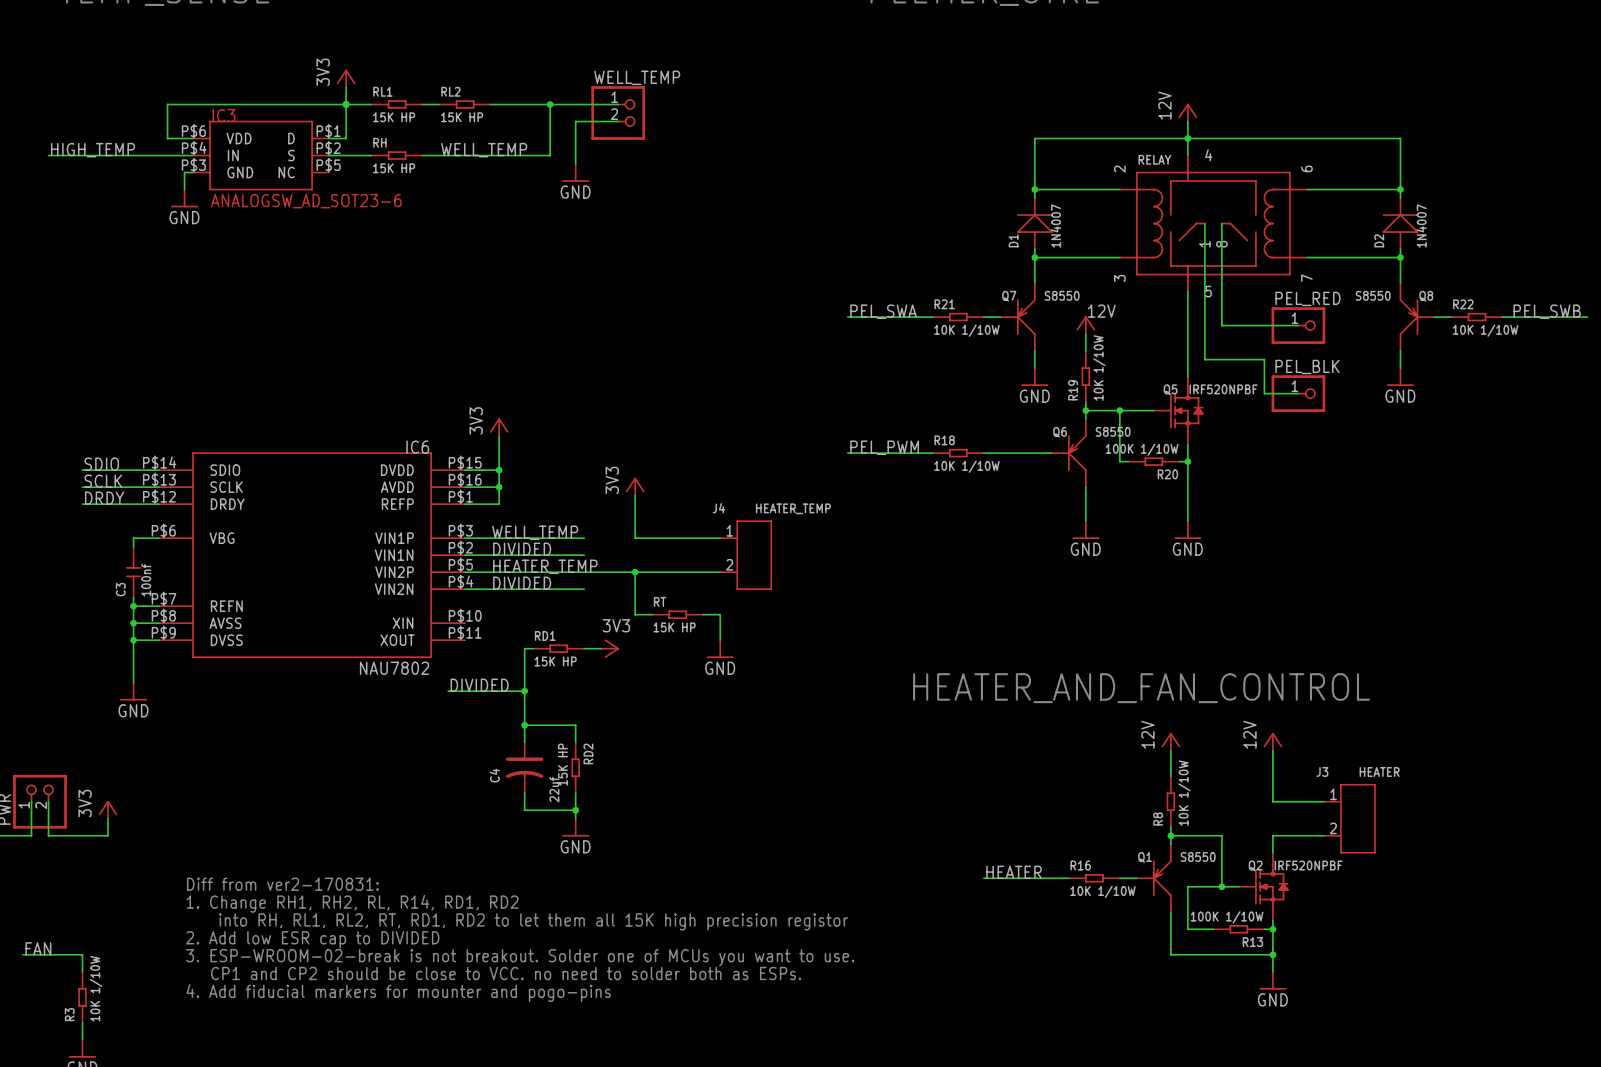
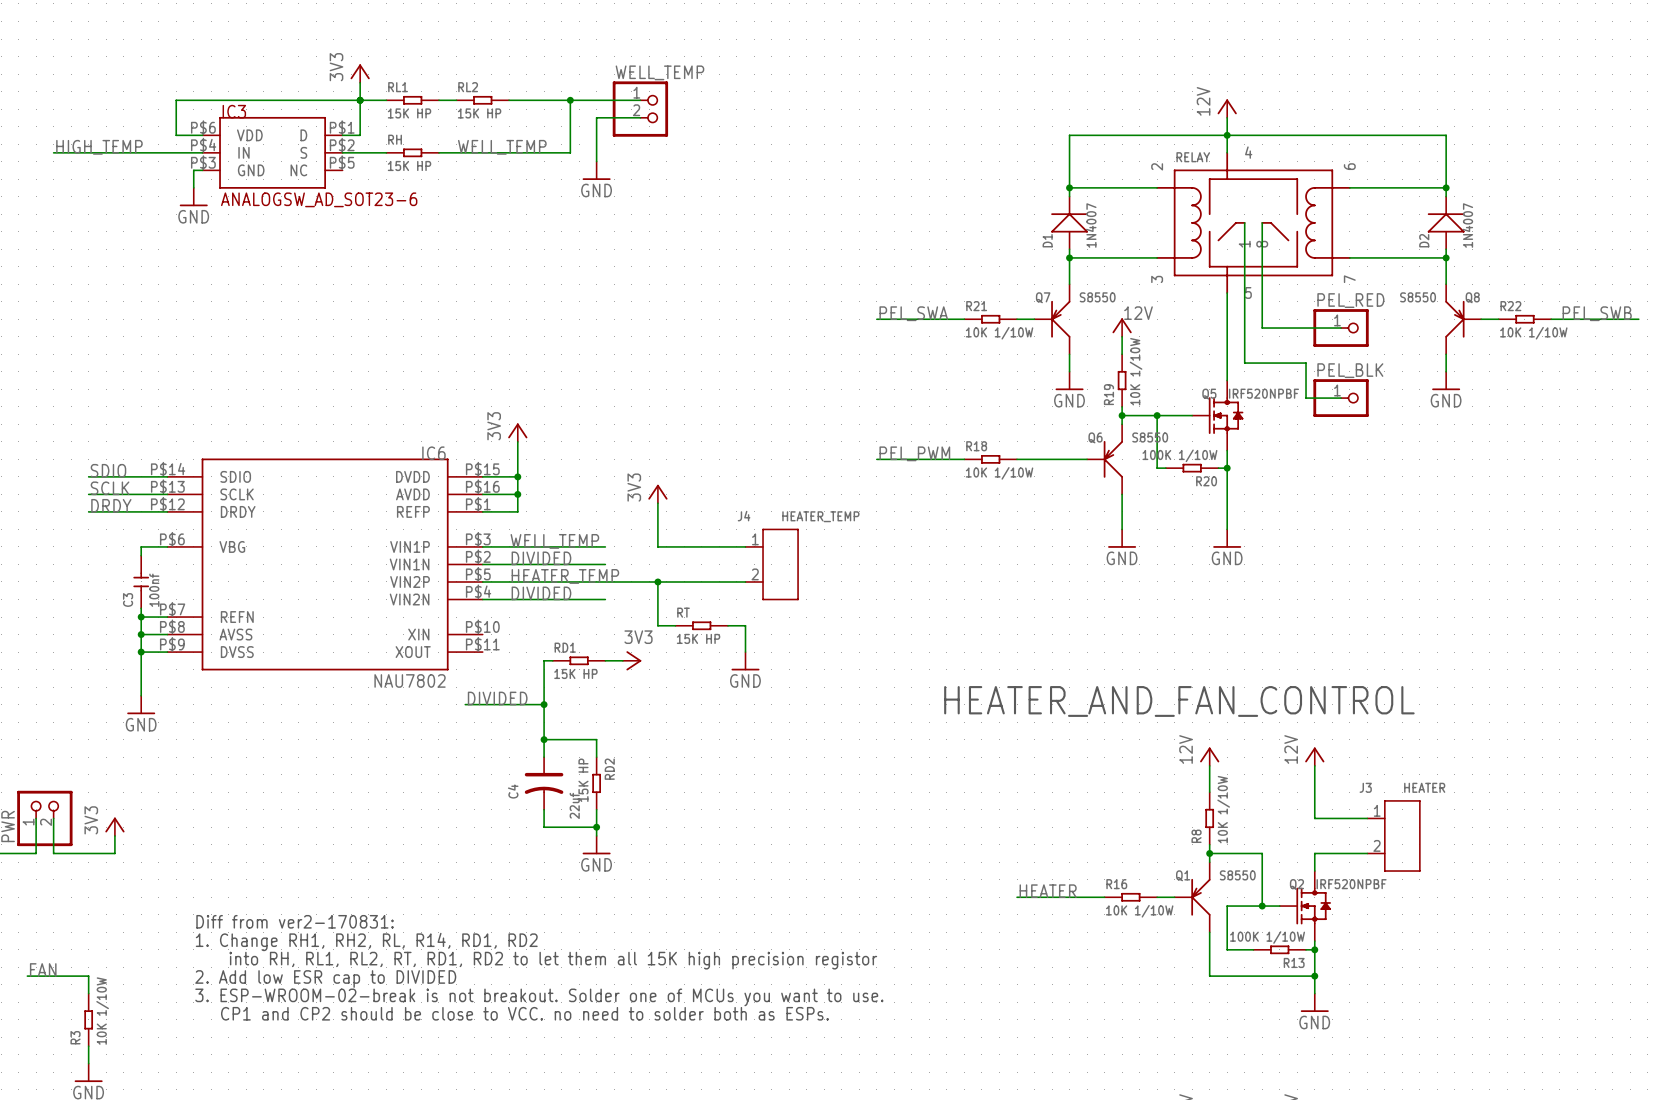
text: Diff from ver2-170831: (282, 884) -> none
text: 1. Change RH1, RH2, RL, R14, RD1, RD2 (352, 903) -> Diff from ver2-170831: (295, 921)
text: into RH, RL1, RL2, RT, RD1, RD2 to let them all 15K high precision registor (533, 921) -> 1. Change RH1, RH2, RL, R14, RD1, RD2 (366, 941)
text: 2. Add low ESR cap to DIVIDED (312, 939) -> into RH, RL1, RL2, RT, RD1, RD2 to let them all 15K high precision registor (553, 960)
text: 3. ESP-WROOM-02-break is not breakout. Solder one of MCUs you want to use. (520, 957) -> 2. Add low ESR cap to DIVIDED (325, 979)
text: CP1 and CP2 should be close to VCC. no need to solder both as ESPs. (506, 973) -> 3. ESP-WROOM-02-break is not breakout. Solder one of MCUs you want to use. (539, 997)
text: 4. Add fiducial markers for mounter and pogo-pins (398, 993) -> CP1 and CP2 should be close to VCC. no need to solder both as ESPs. (524, 1013)

